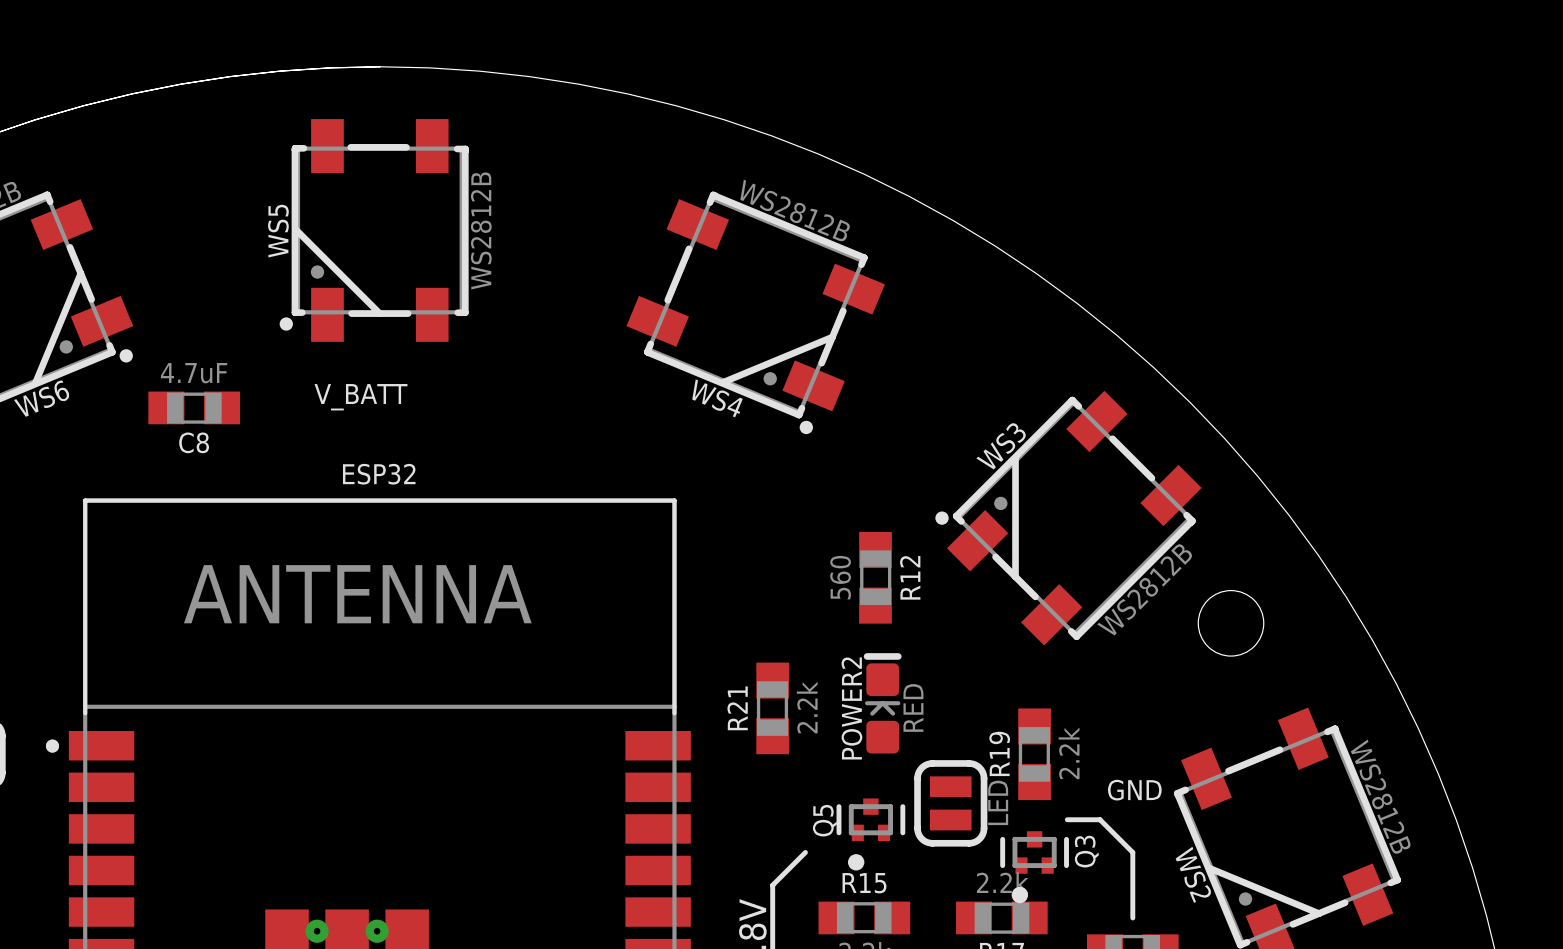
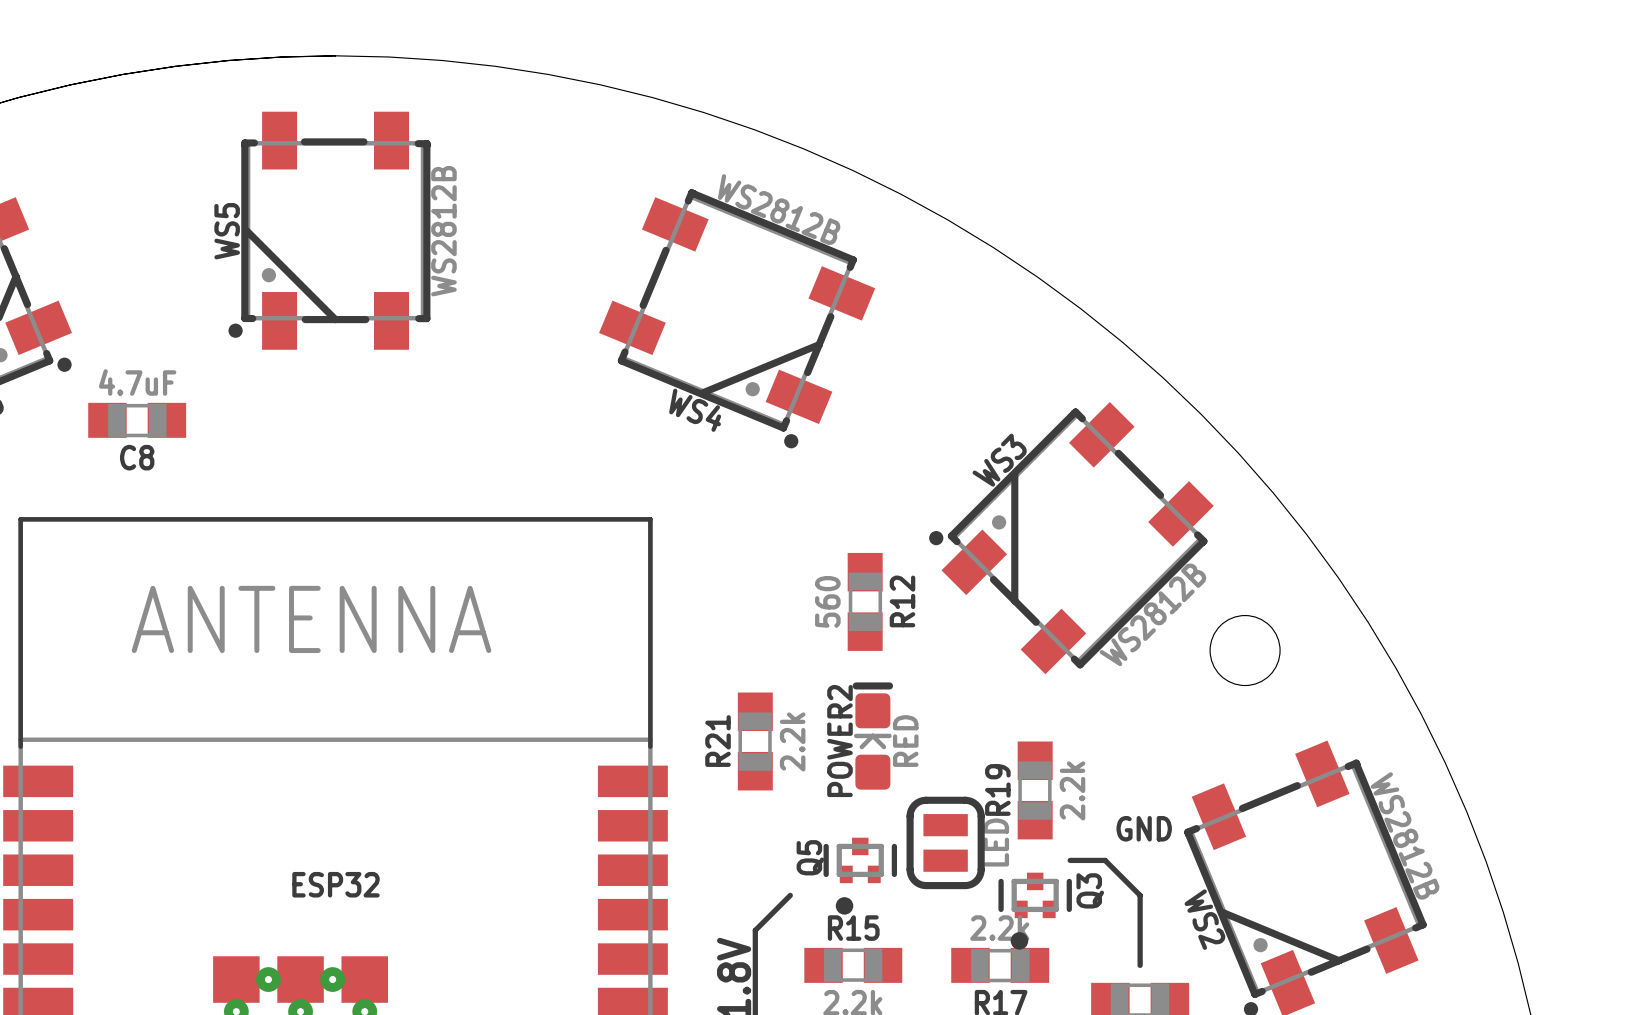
text: V_BATT (361, 397) -> none
ESP32 name position: ESP32 (379, 474) -> ESP32 (335, 884)

